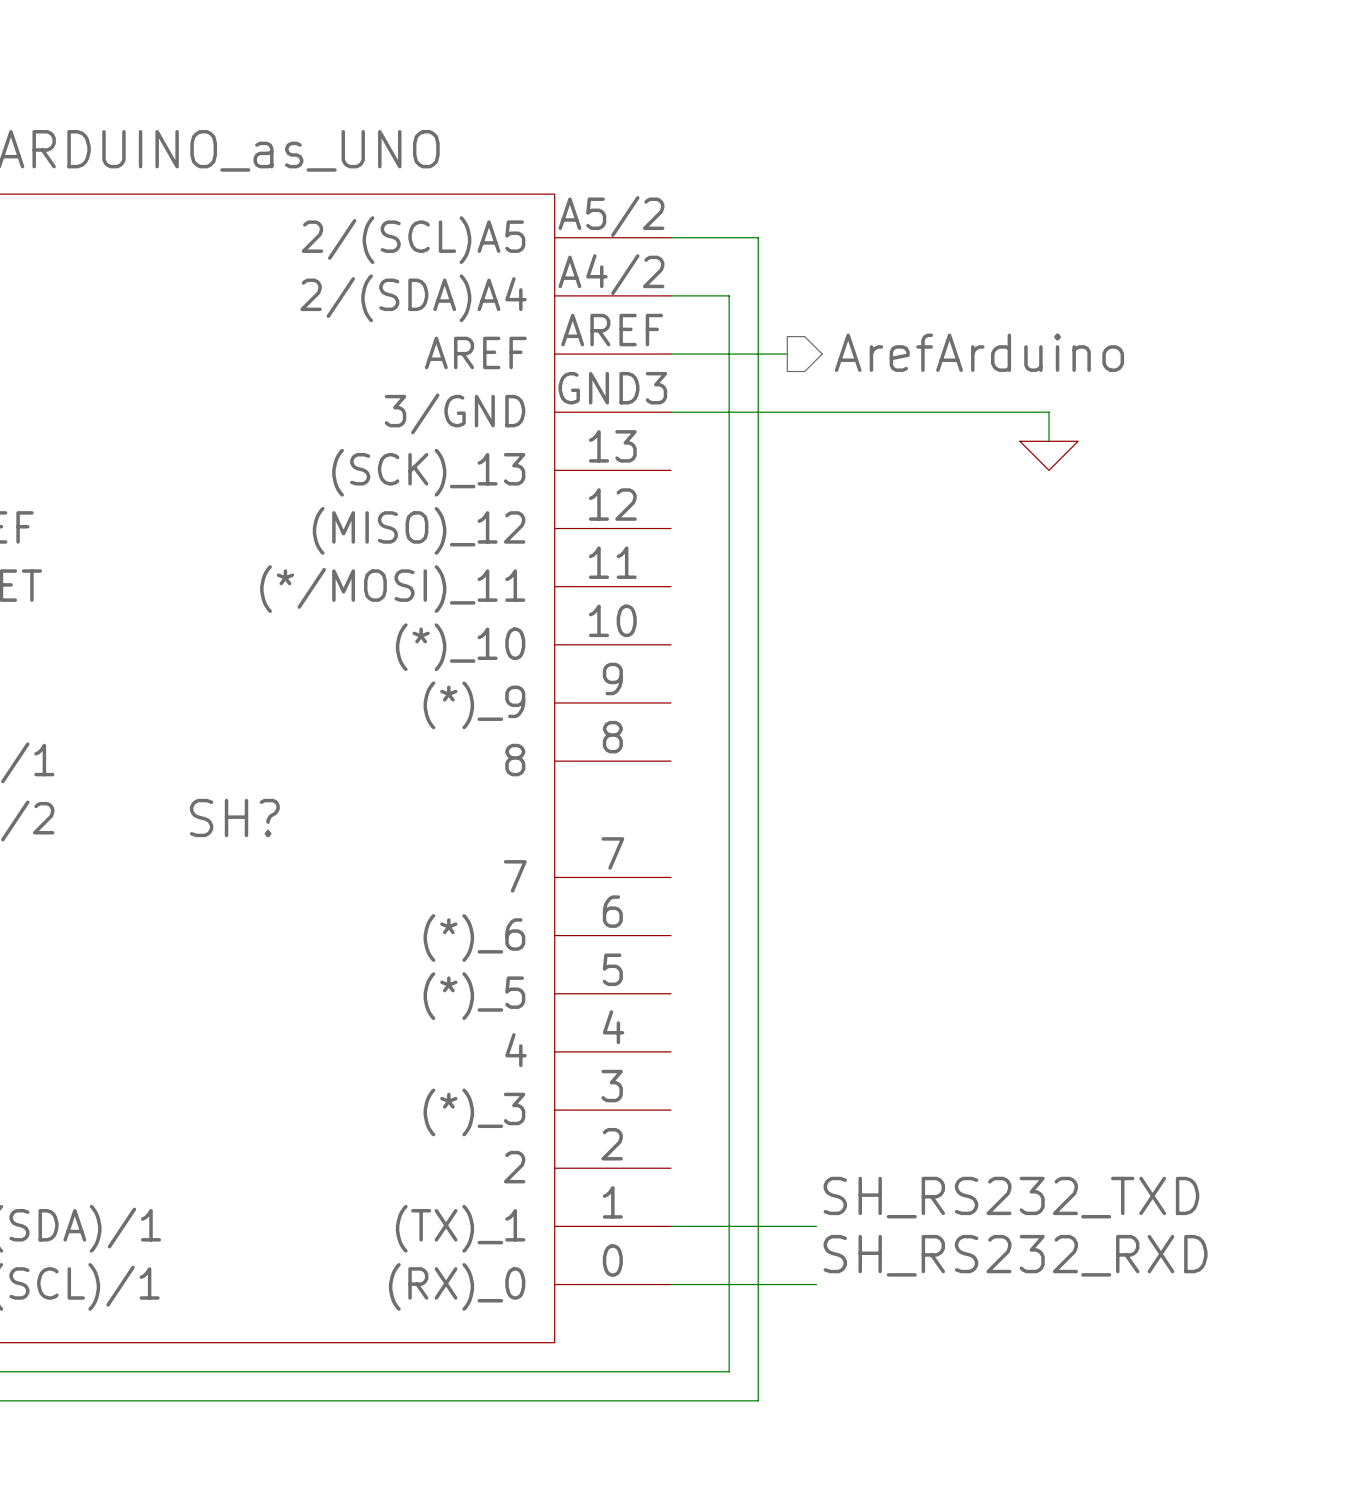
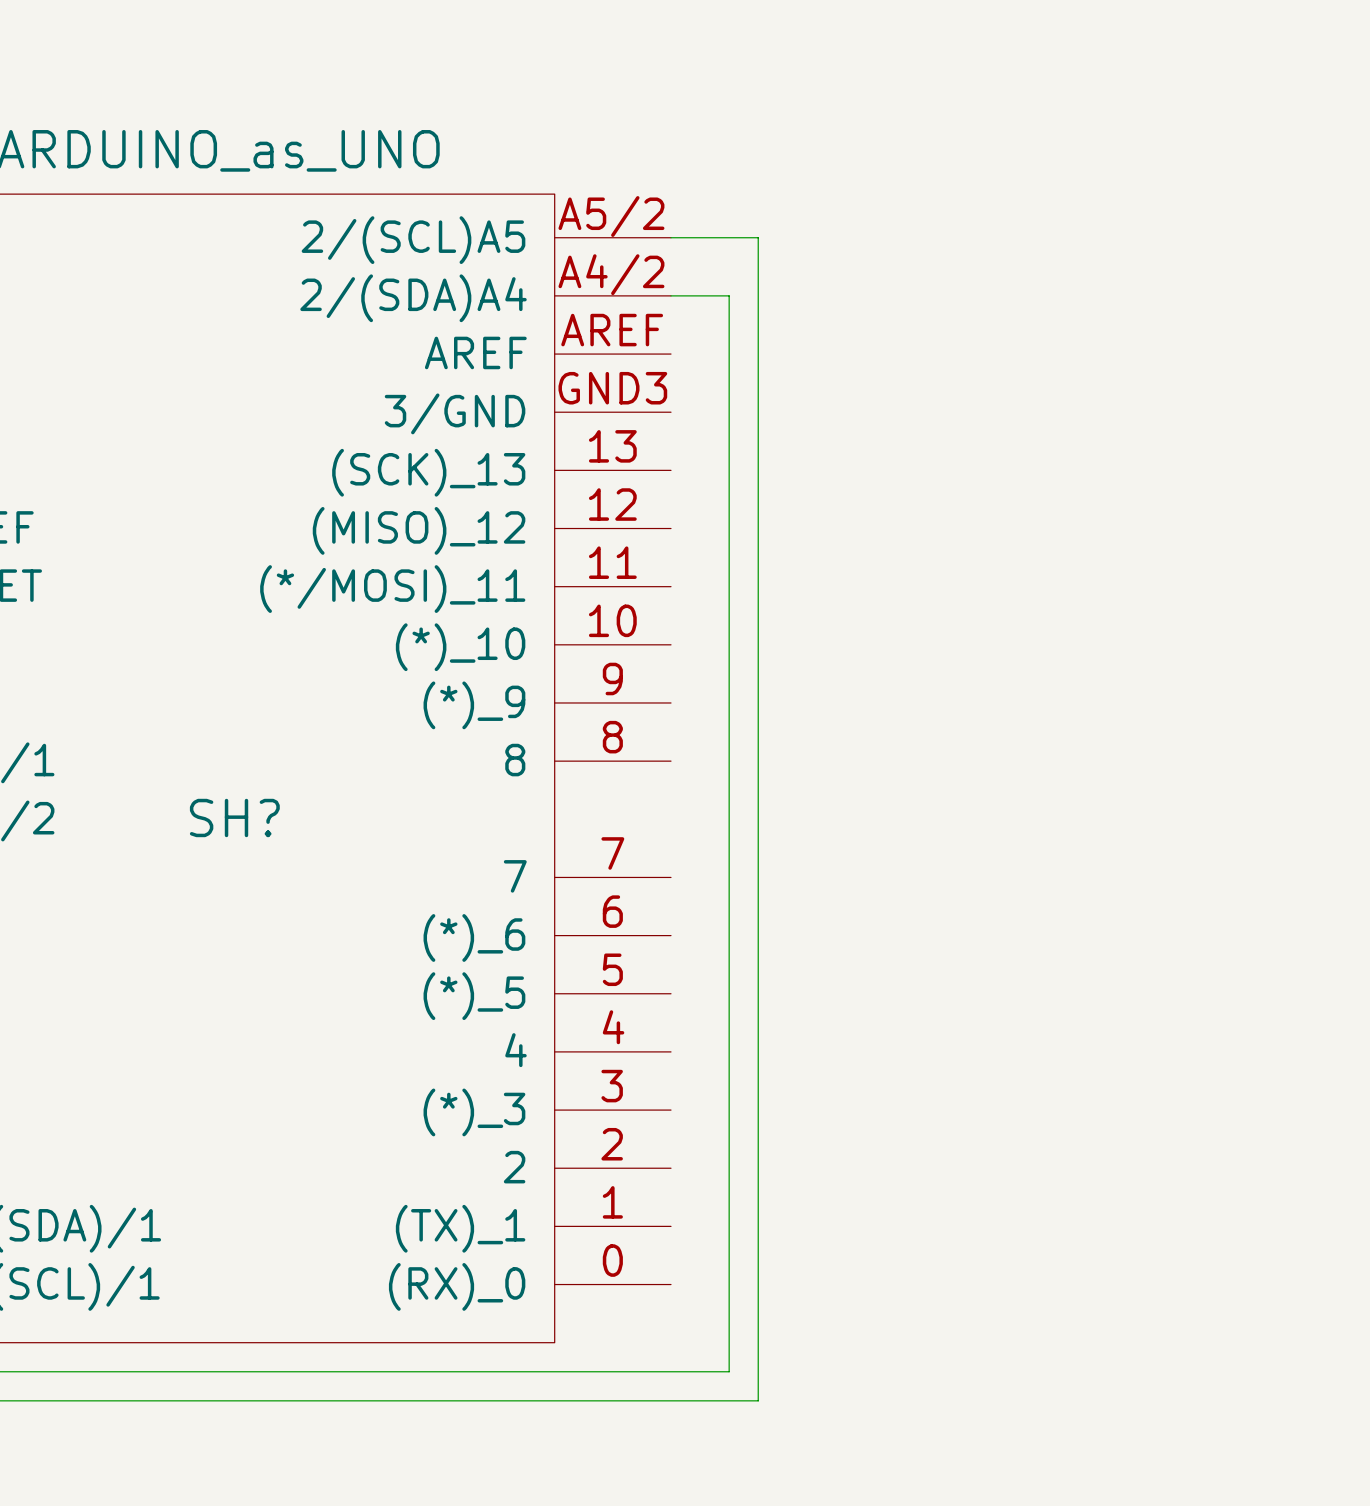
hierarchical label: ArefArduino (979, 352) -> none
wire: (671, 354) (787, 354) -> none
wire: (671, 412) (1049, 412) (1049, 441) -> none
power symbol: (1049, 455) -> none
label: SH_RS232_TXD (1011, 1197) -> none
wire: (671, 1226) (816, 1226) -> none
label: SH_RS232_RXD (1015, 1255) -> none
wire: (671, 1284) (816, 1284) -> none

